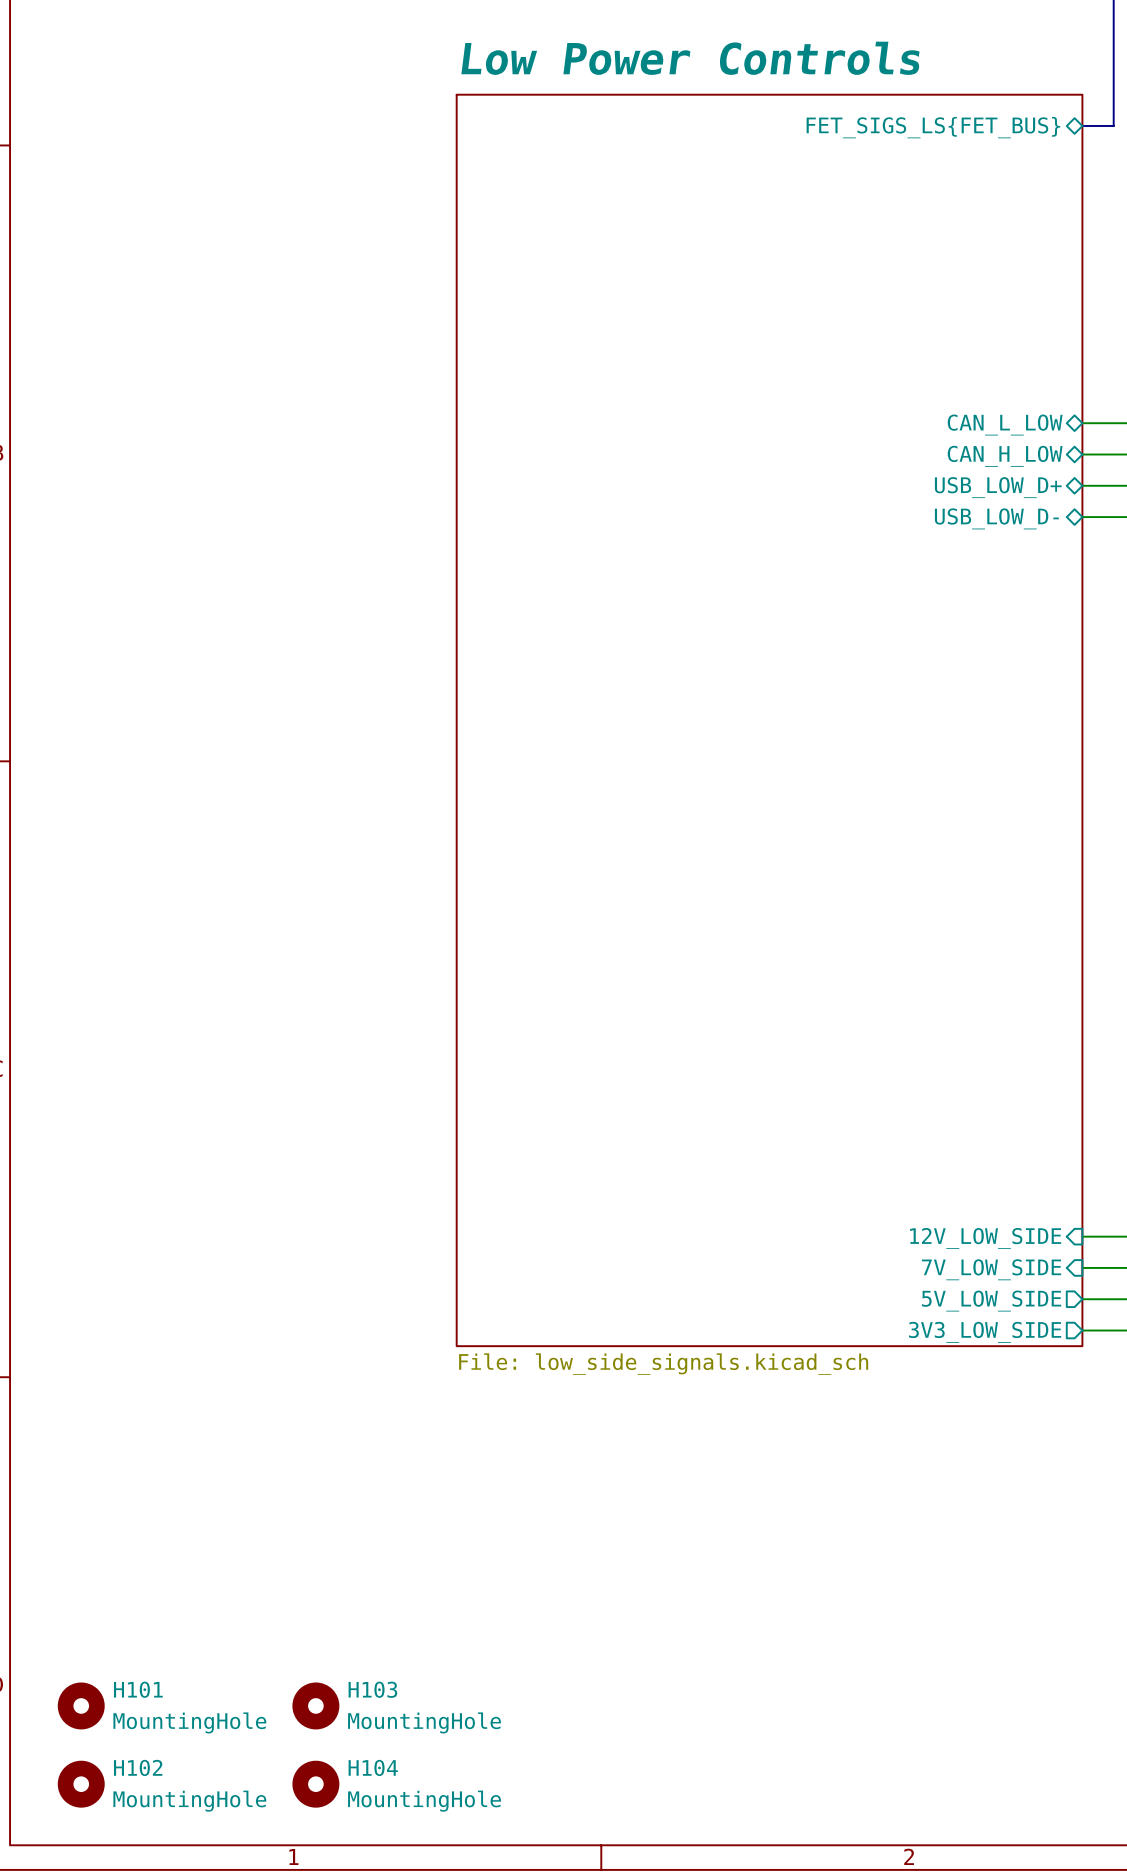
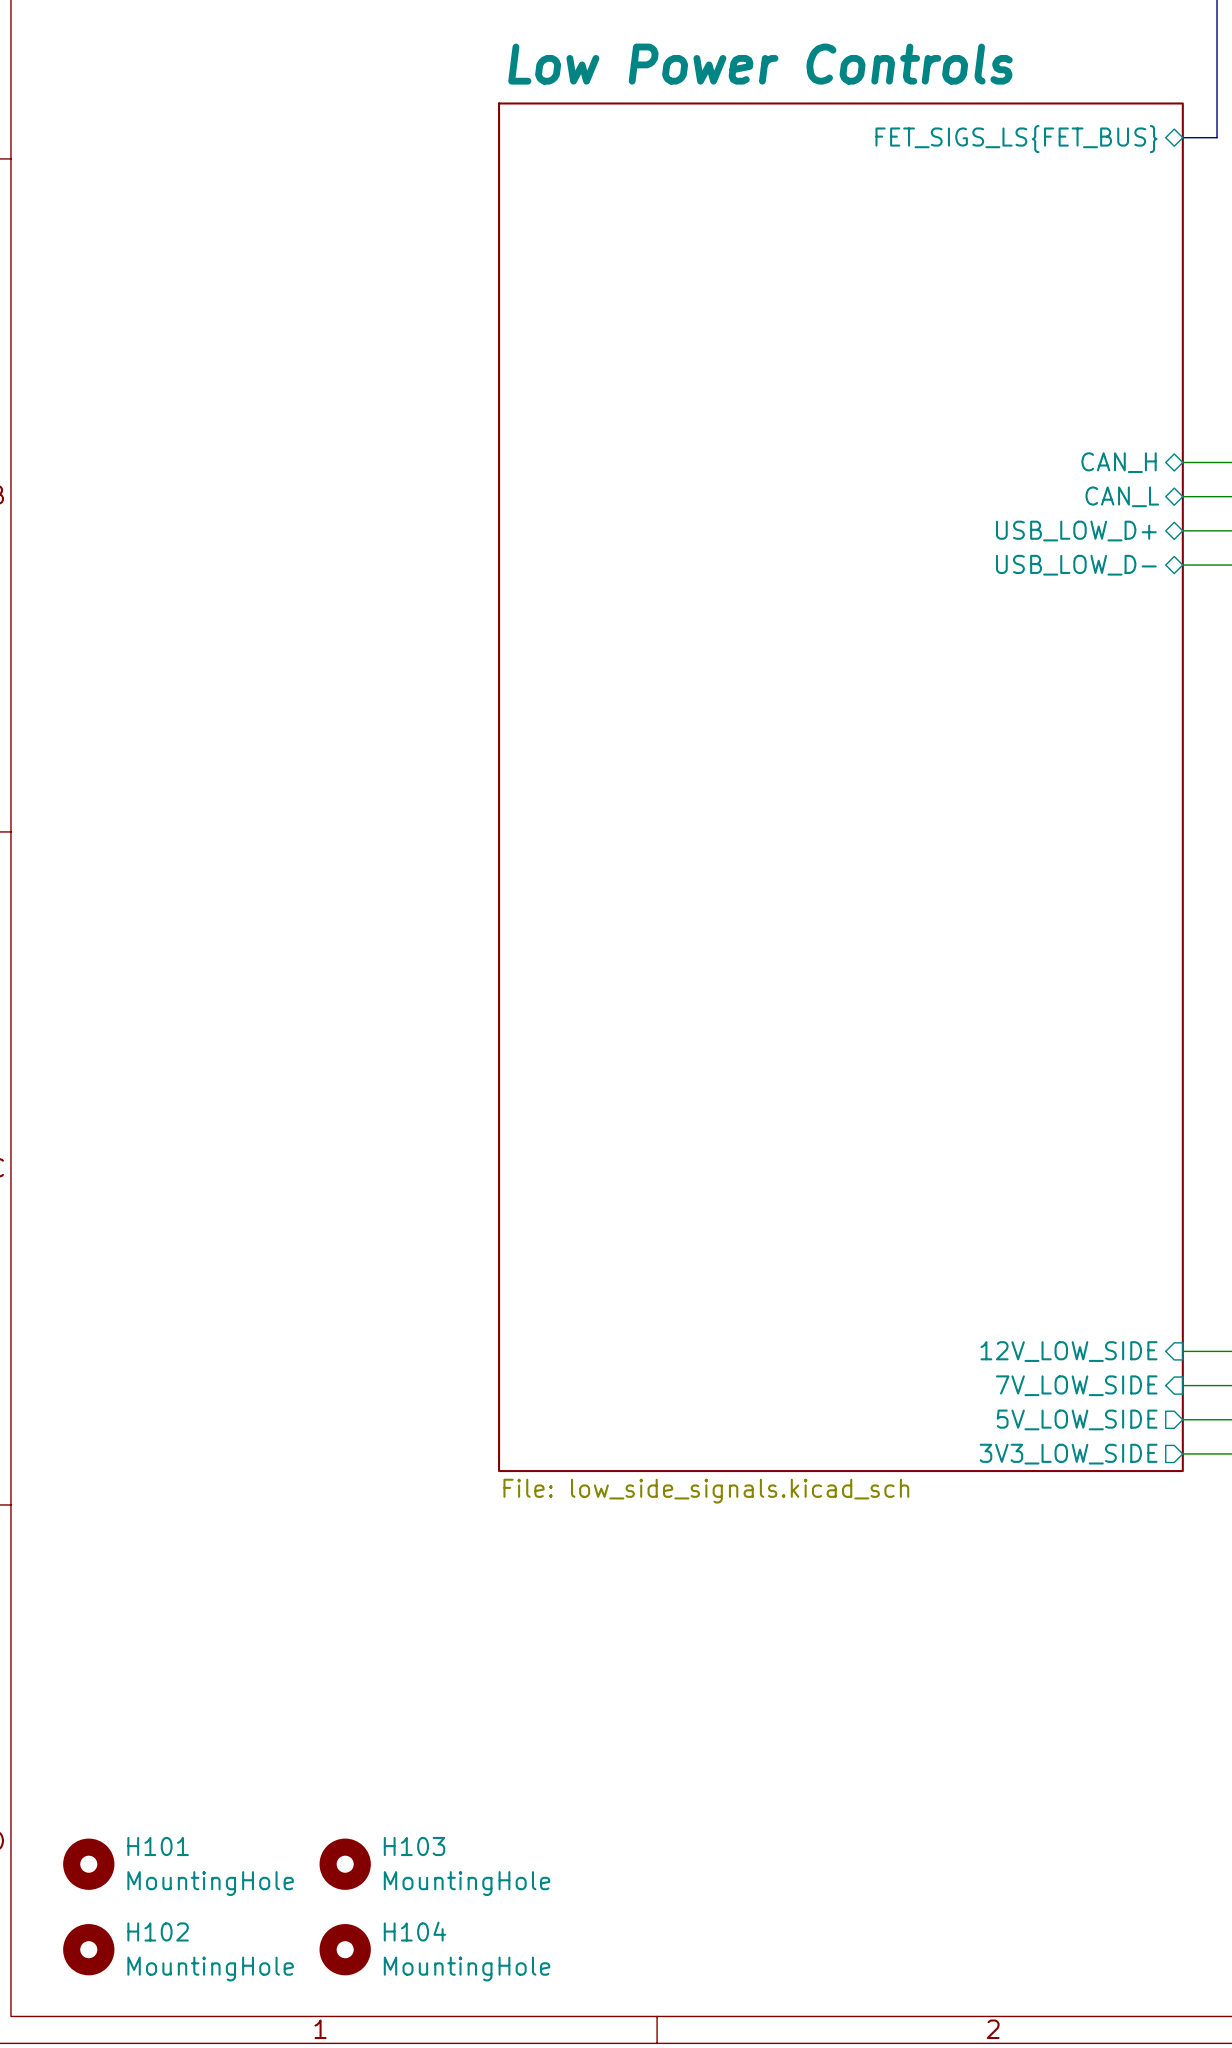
sheet pin: CAN_L_LOW (1005, 425) -> CAN_H (1119, 462)
sheet pin: CAN_H_LOW (1005, 456) -> CAN_L (1122, 496)

